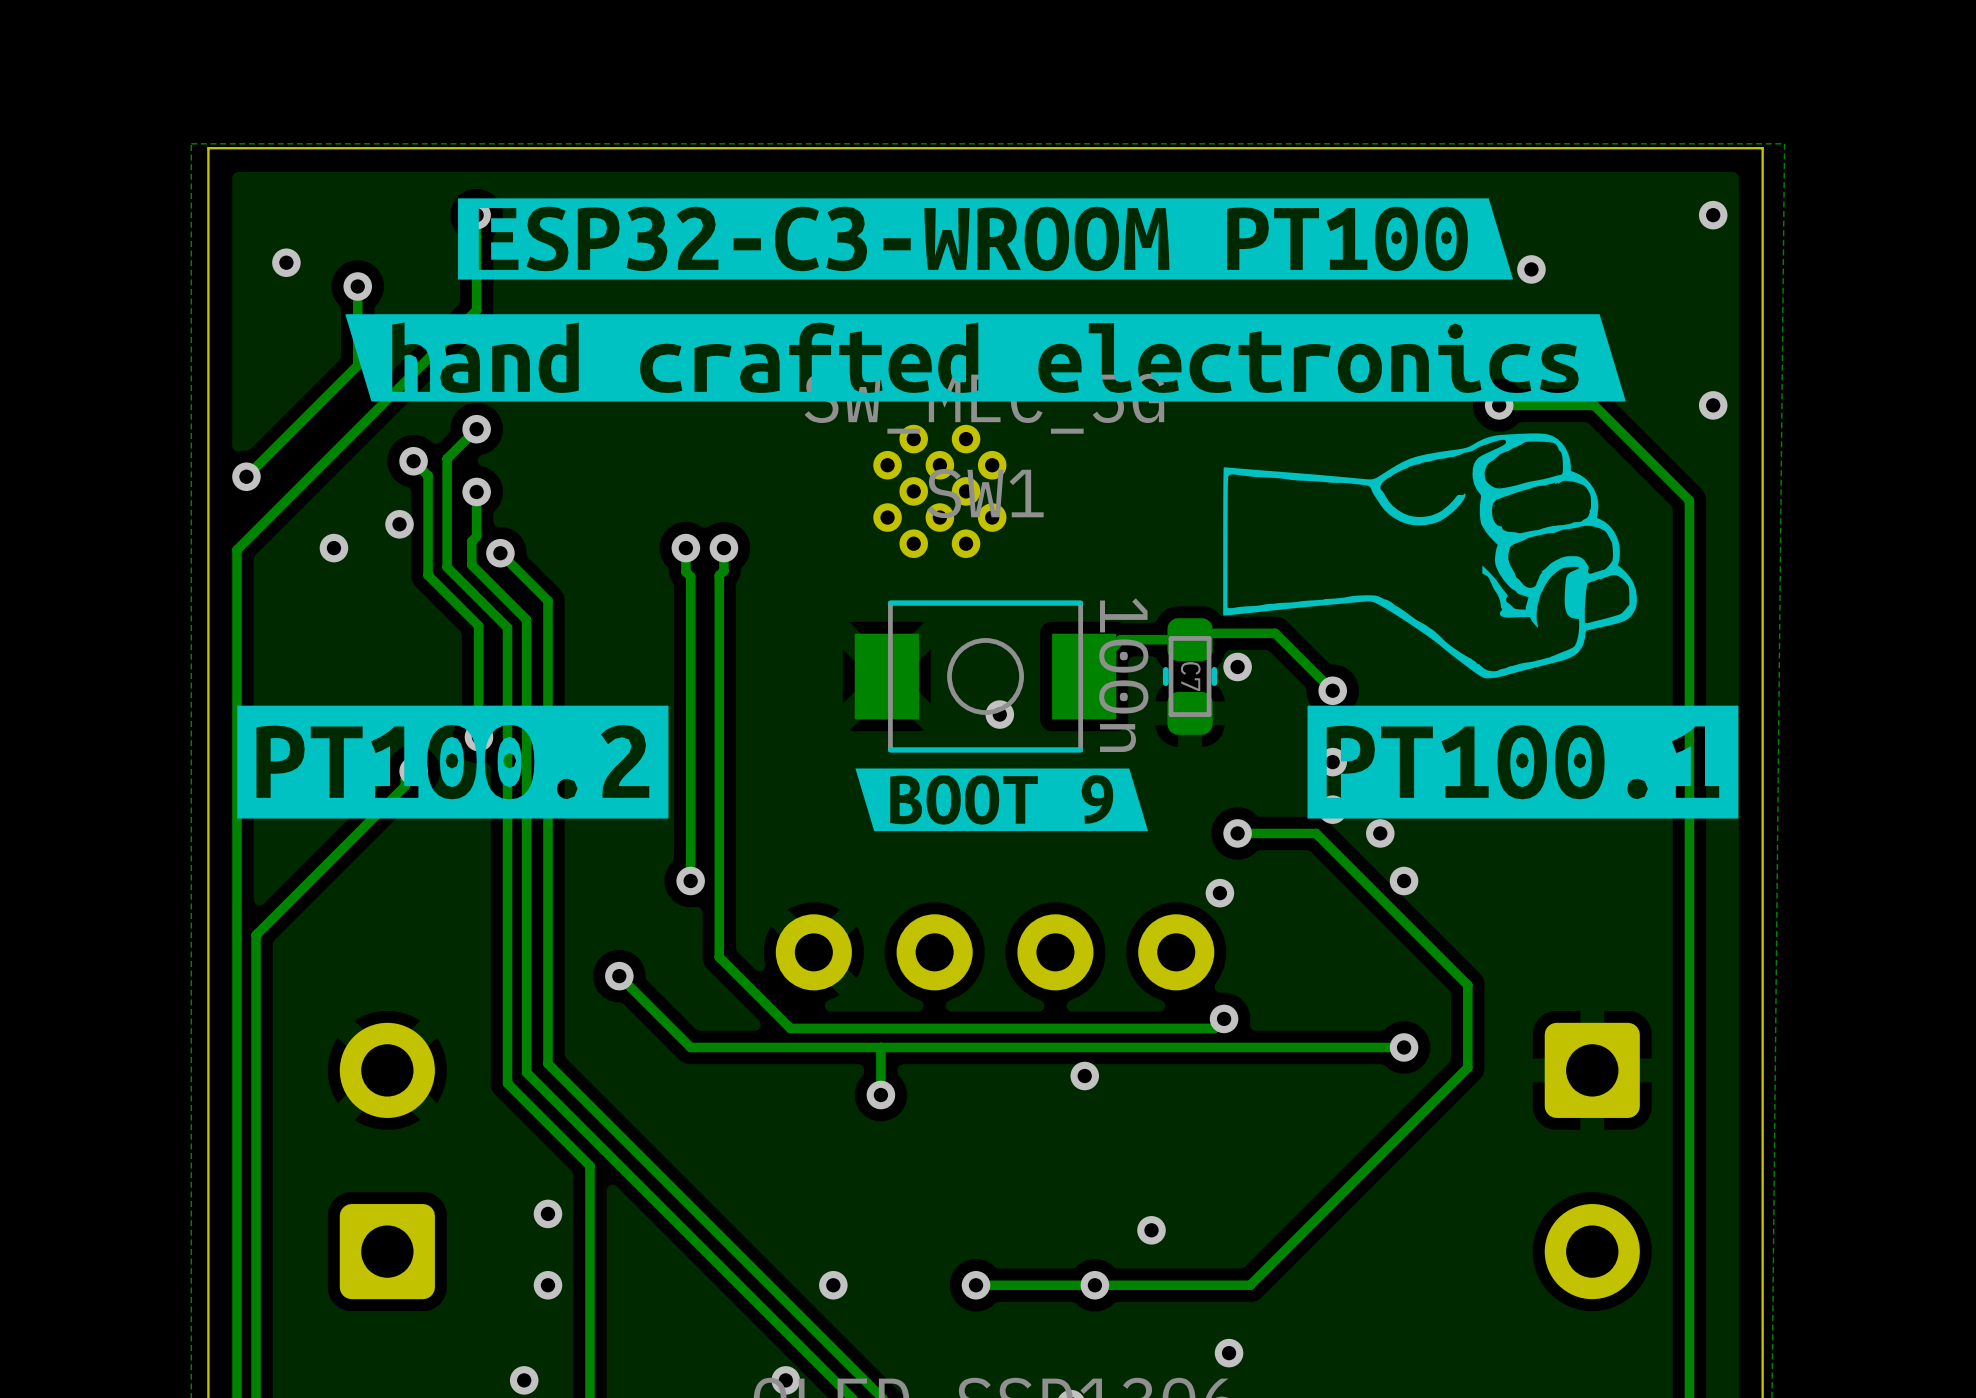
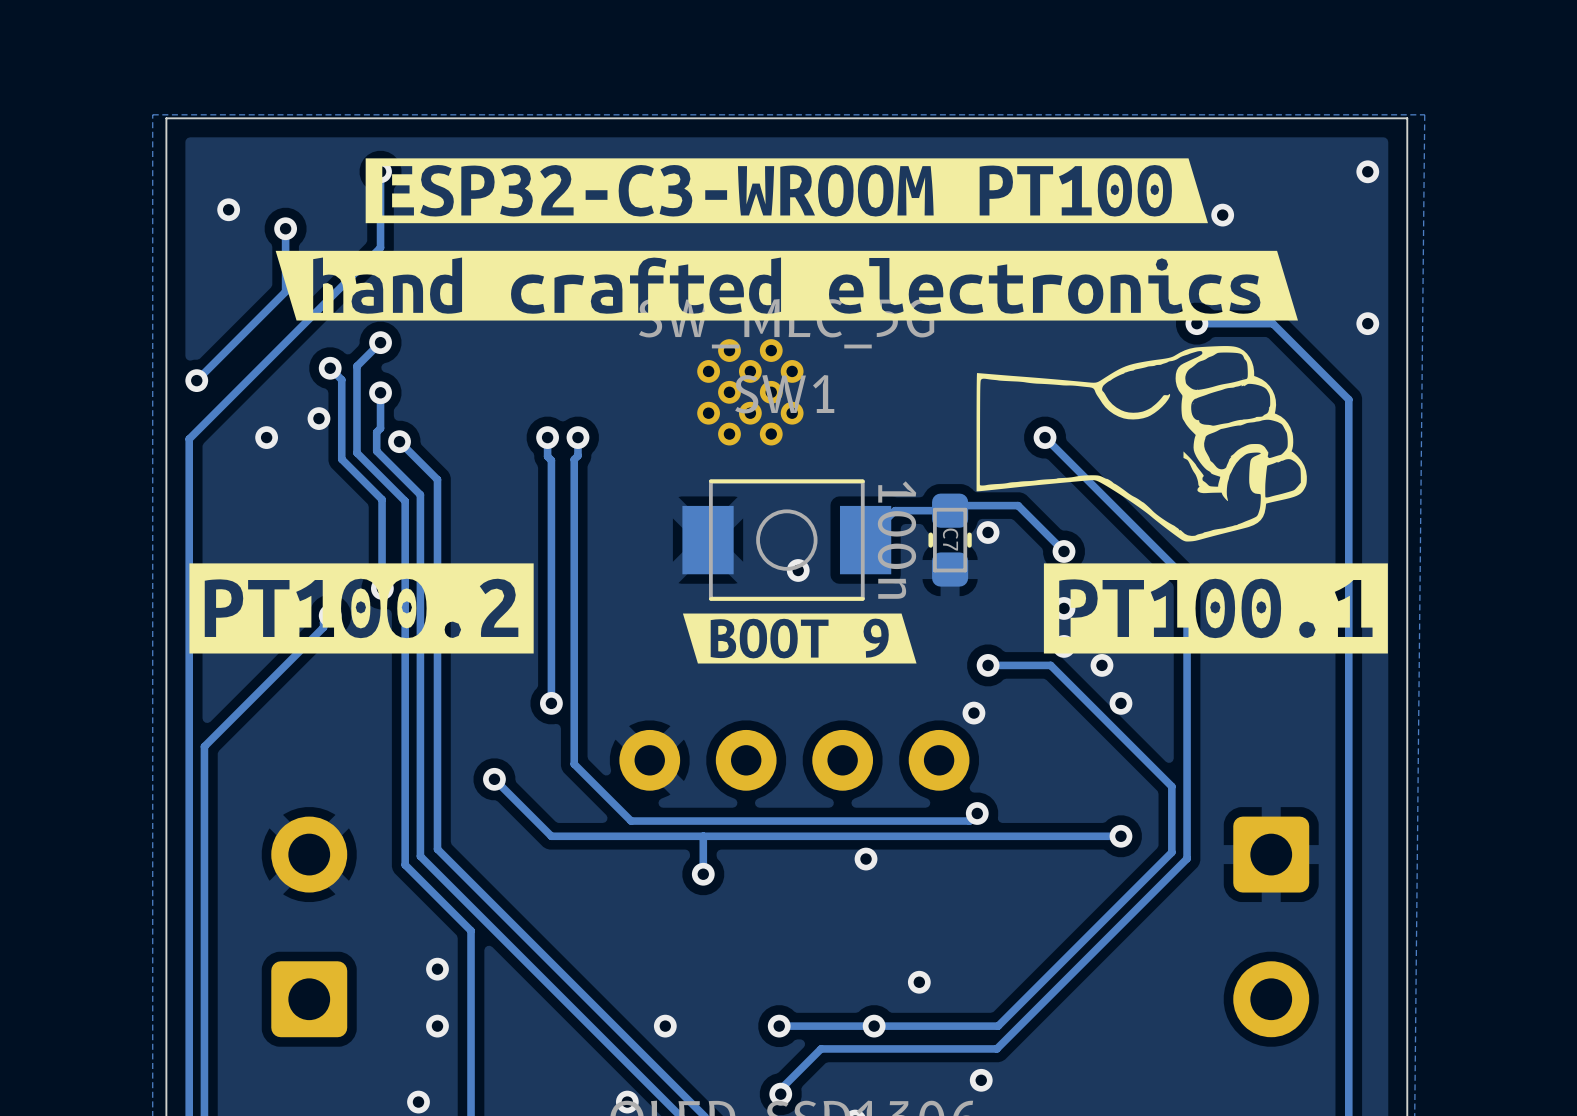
track: none -> (1045, 437) (1187, 579) (1187, 858) (996, 1048) (821, 1048) (779, 1090)
via: none -> (1045, 437)
via: none -> (780, 1094)

